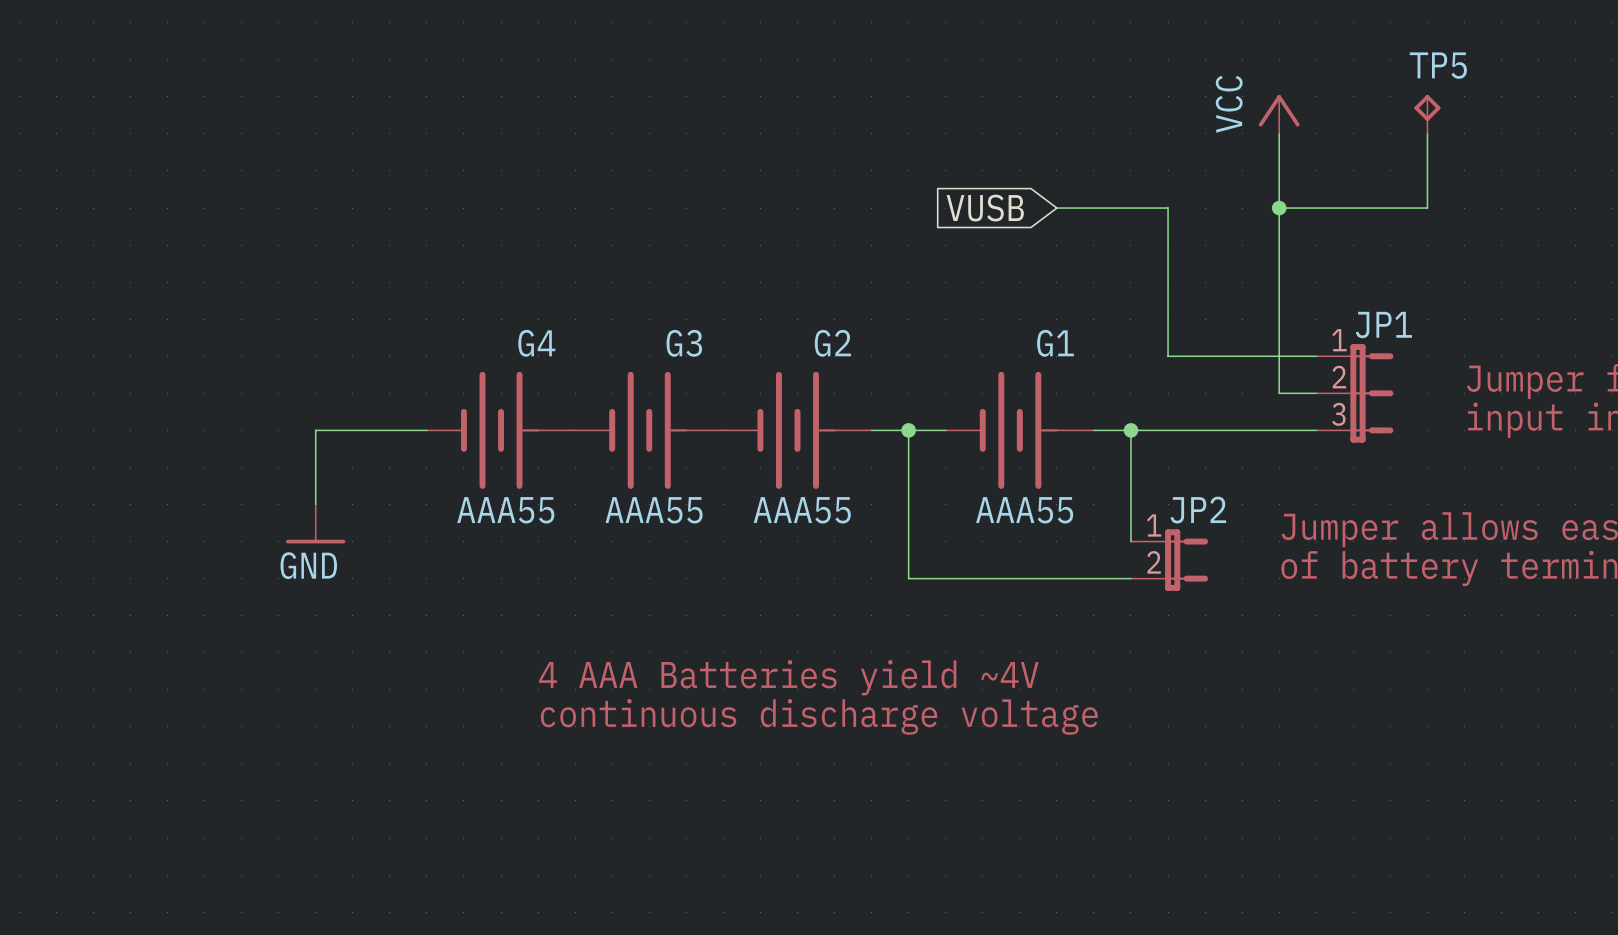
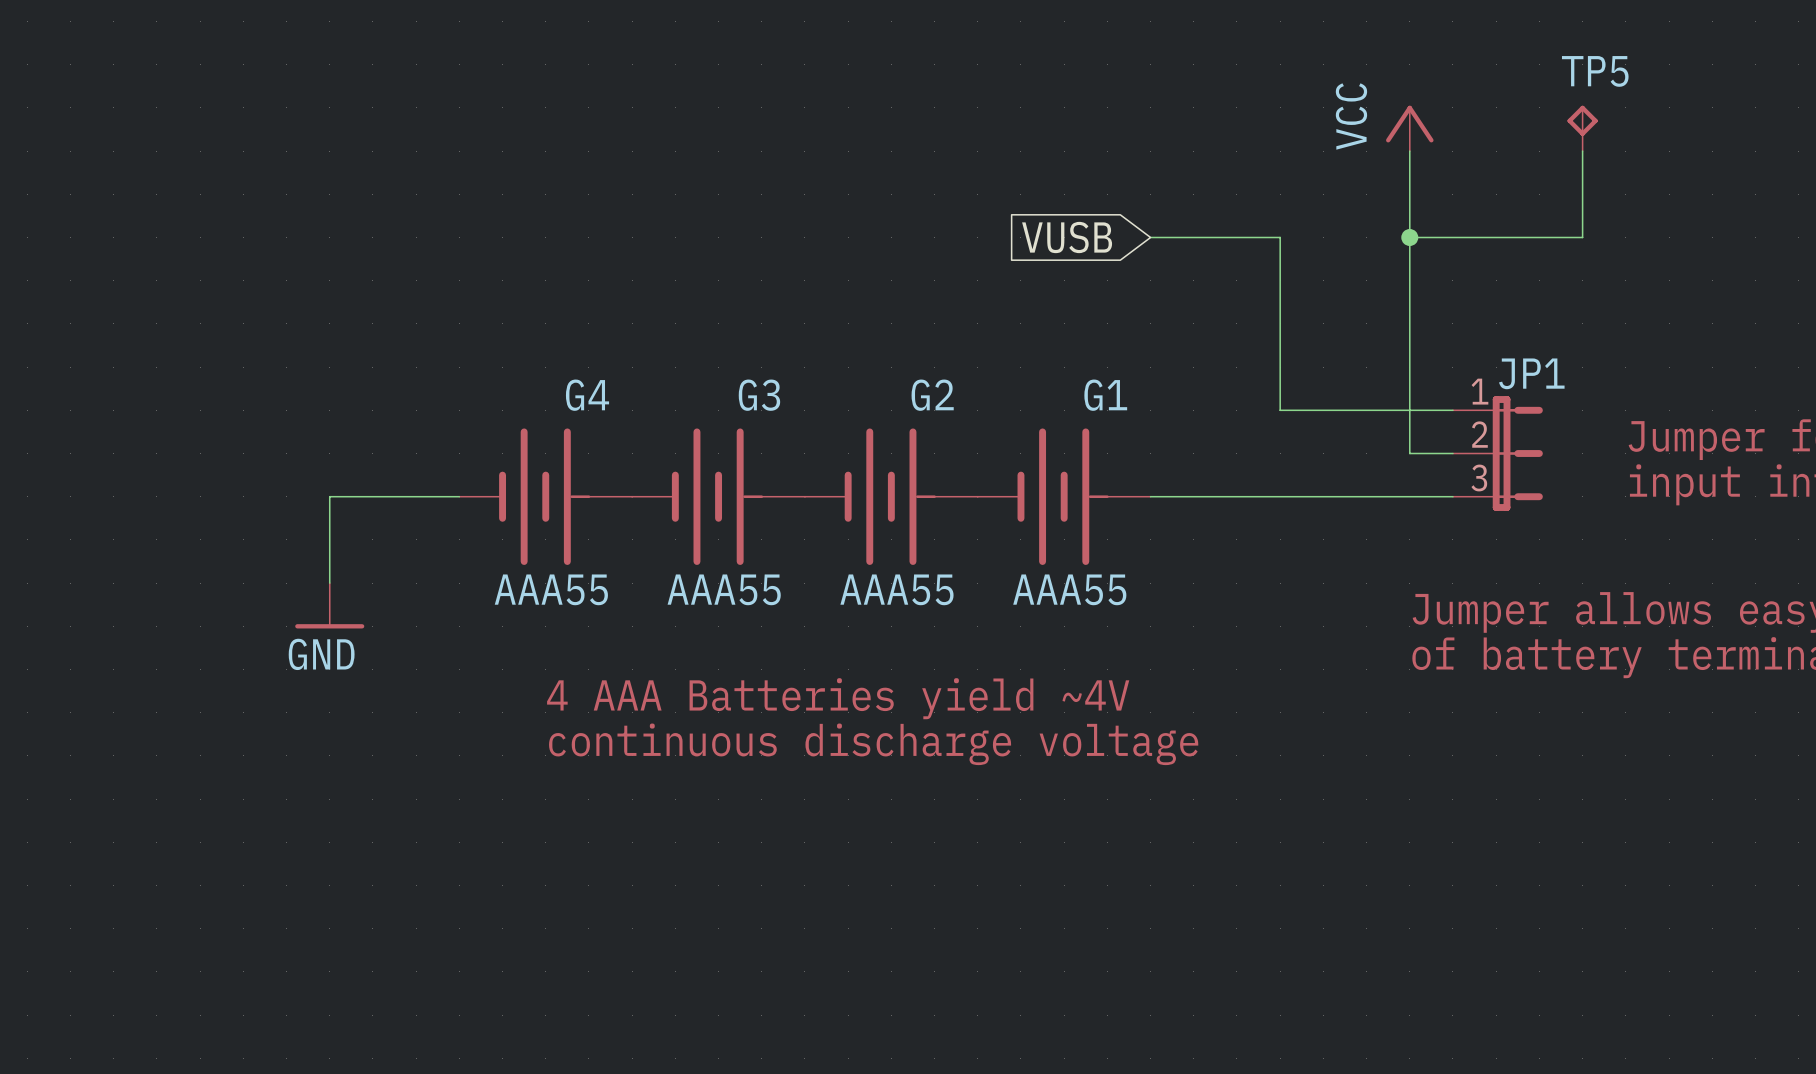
wire: (352, 430) (315, 430) (315, 504) -> (329, 496) (329, 583)
G4 position: (501, 430) -> (545, 496)
G3 position: (649, 430) -> (718, 496)
G2 position: (797, 430) -> (891, 496)
wire: (908, 430) (908, 578) (1130, 578) -> none
junction: (908, 430) -> none
G1 position: (1019, 430) -> (1064, 496)
wire: (1130, 430) (1130, 541) -> none
junction: (1130, 430) -> none
power symbol position: GND (315, 523) -> GND (329, 605)
JP2: (1169, 560) -> none
text position: 4 AAA Batteries yield ~4V (788, 677) -> 4 AAA Batteries yield ~4V (838, 698)
text position: continuous discharge voltage (819, 716) -> continuous discharge voltage (873, 744)

